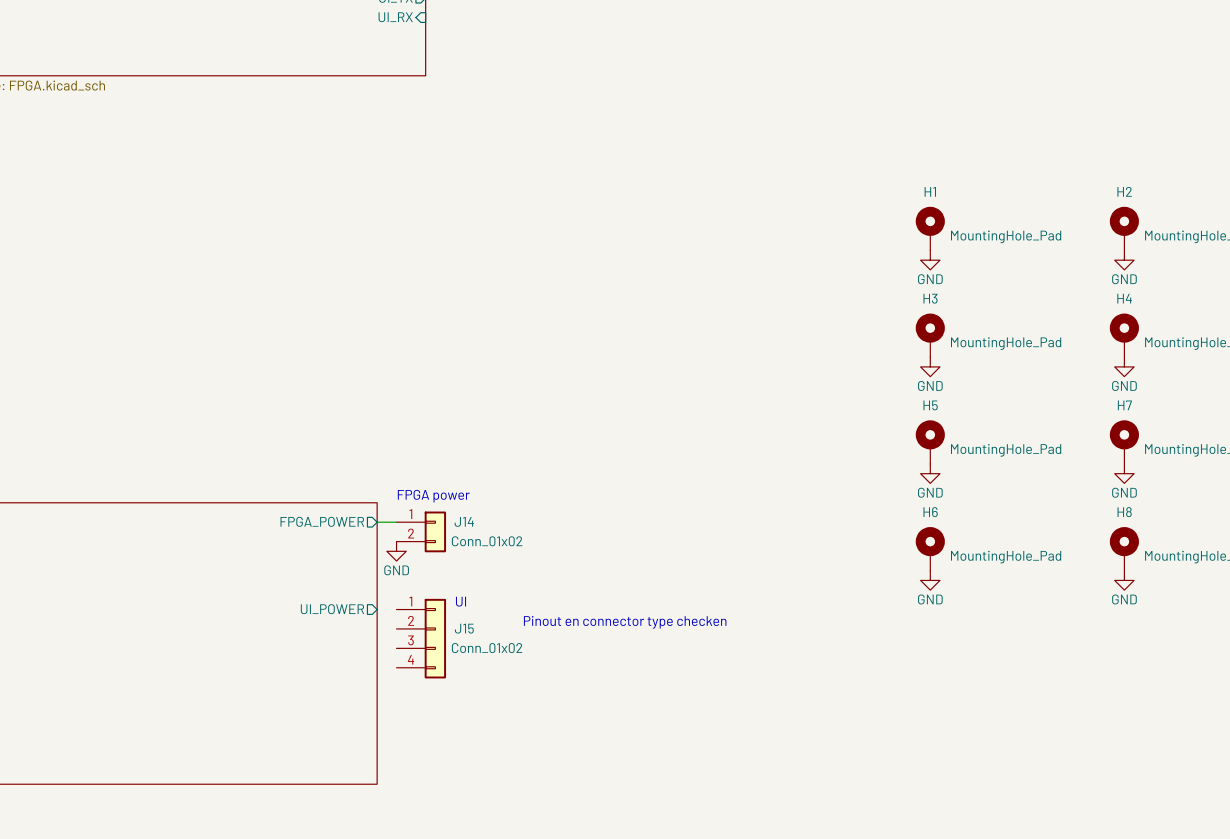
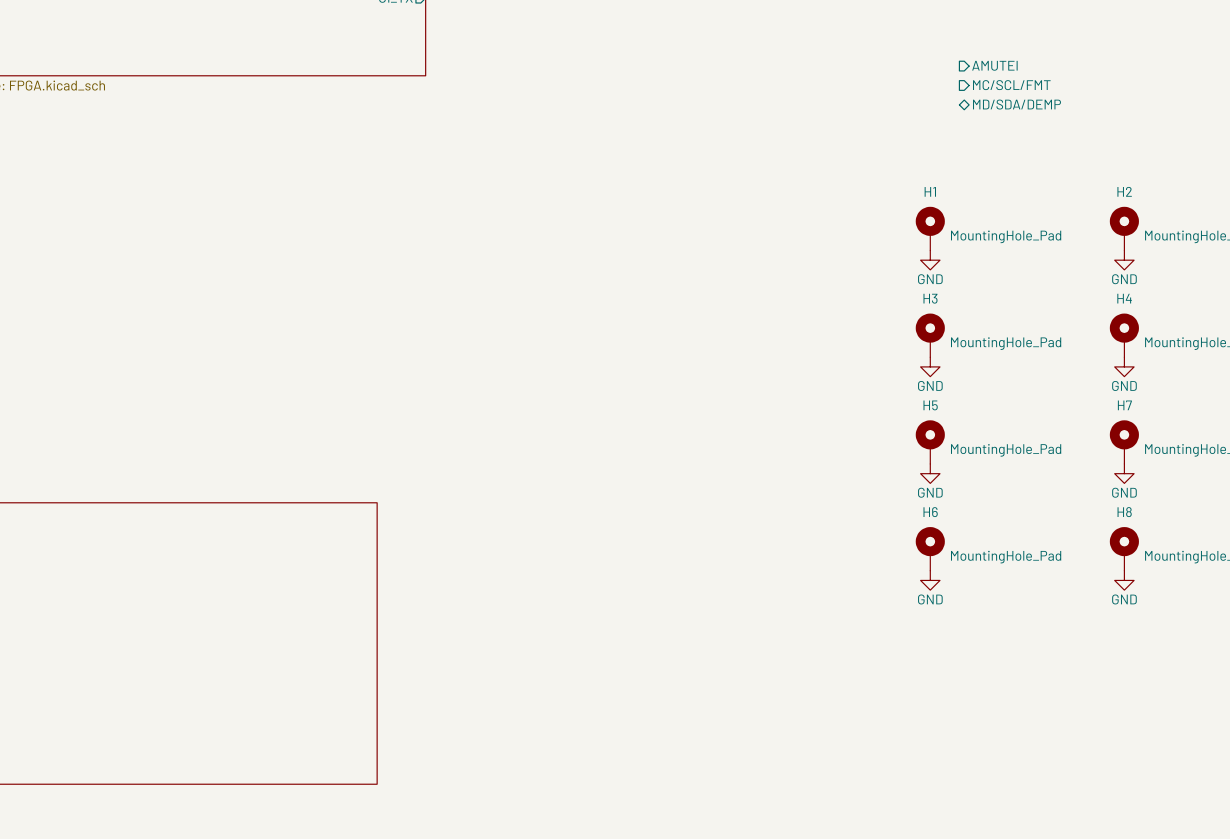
sheet pin: UI_RX (395, 17) -> none
sheet pin: none -> AMUTEI (994, 65)
sheet pin: none -> MC/SCL/FMT (1011, 85)
sheet pin: none -> MD/SDA/DEMP (1016, 104)
text: FPGA power (433, 496) -> none
sheet pin: FPGA_POWER (322, 521) -> none
wire: (377, 522) (396, 522) -> none
J14: Conn_01x02 (421, 531) -> none
power symbol: GND (396, 551) -> none
text: UI (461, 601) -> none
sheet pin: UI_POWER (332, 609) -> none
text: Pinout en connector type checken (625, 622) -> none
J15: Conn_01x02 (421, 638) -> none

